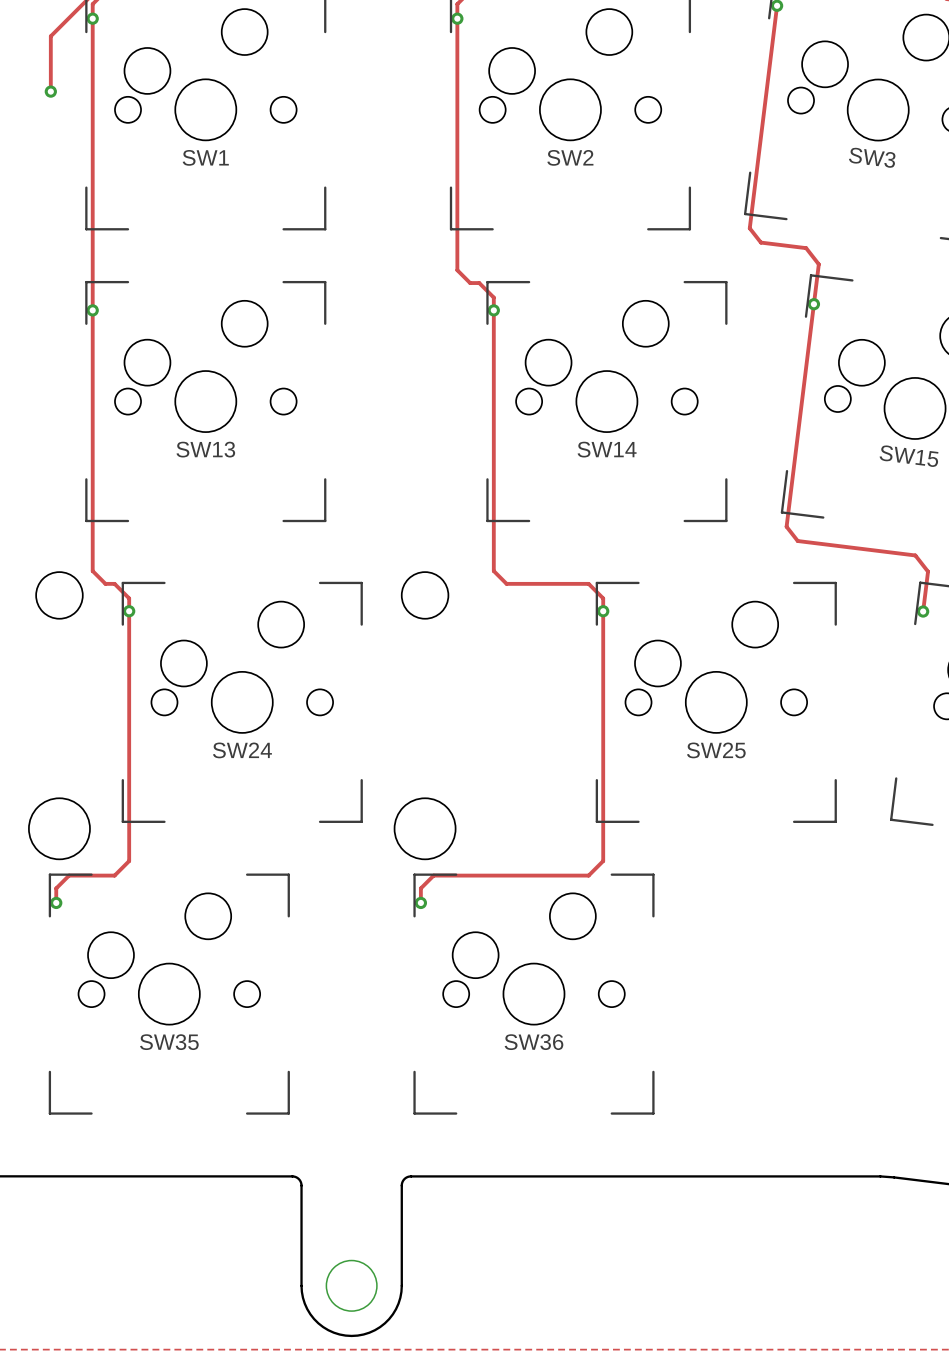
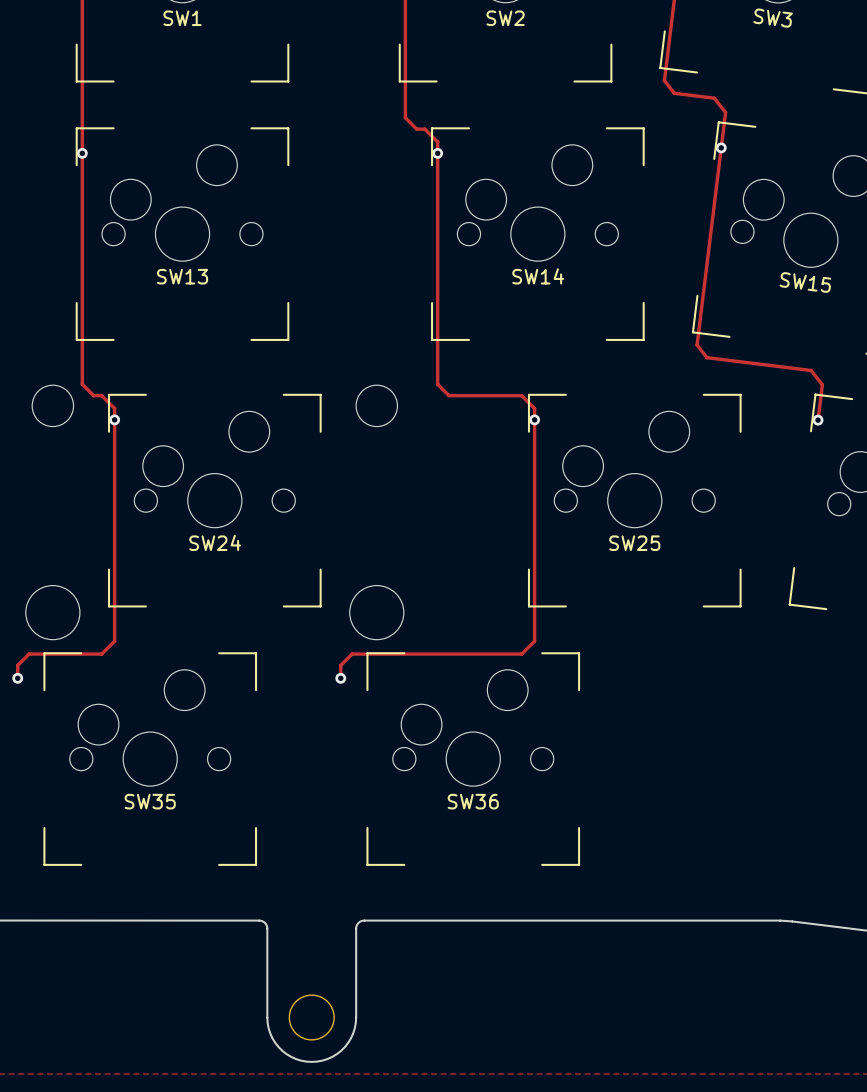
track: (69, 875) (56, 888) (56, 902) -> (61, 654) (29, 654) (17, 665) (17, 678)
track: (433, 875) (420, 888) (420, 902) -> (384, 654) (352, 654) (340, 665) (340, 678)
via position: (56, 902) -> (17, 678)
via position: (420, 902) -> (340, 678)

